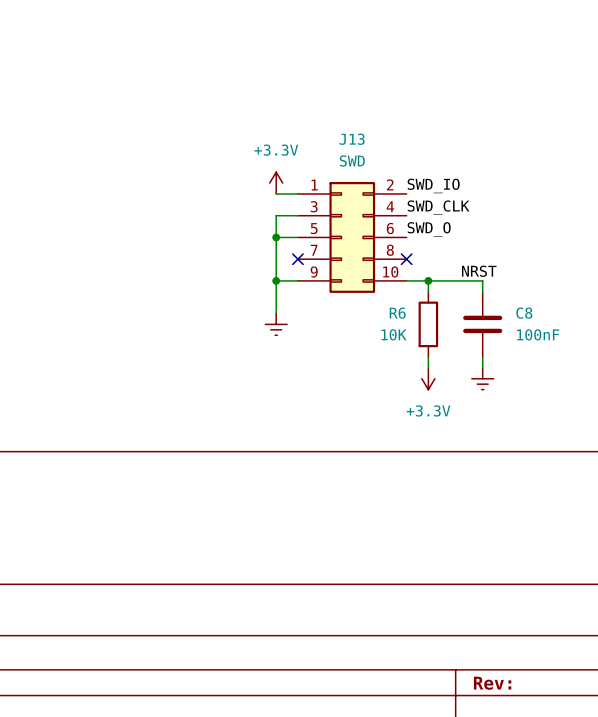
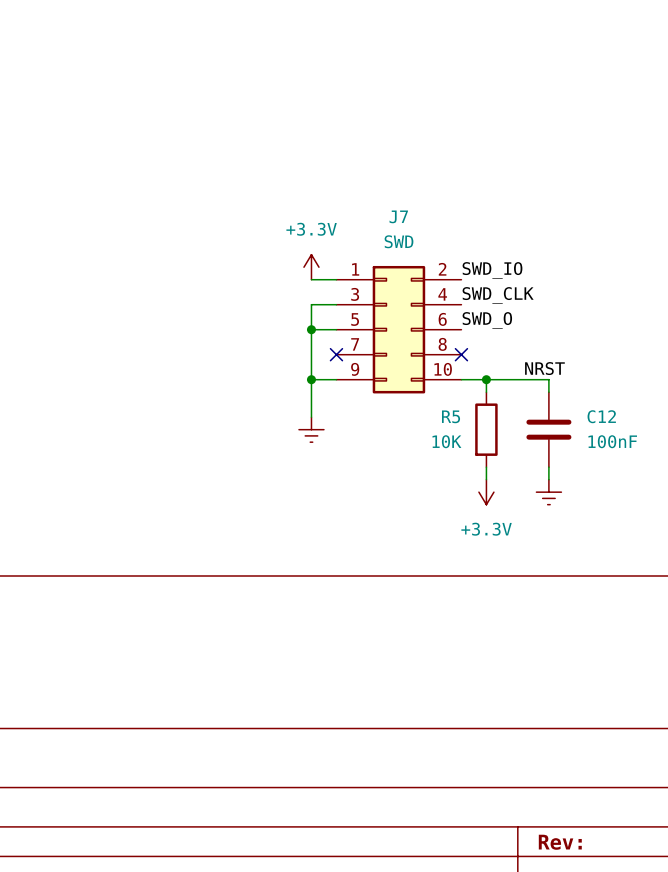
J13 name: J13 (352, 139) -> J7 (398, 216)
R6 name: R6 (397, 313) -> R5 (451, 416)
C8 name: C8 (524, 313) -> C12 (601, 416)

